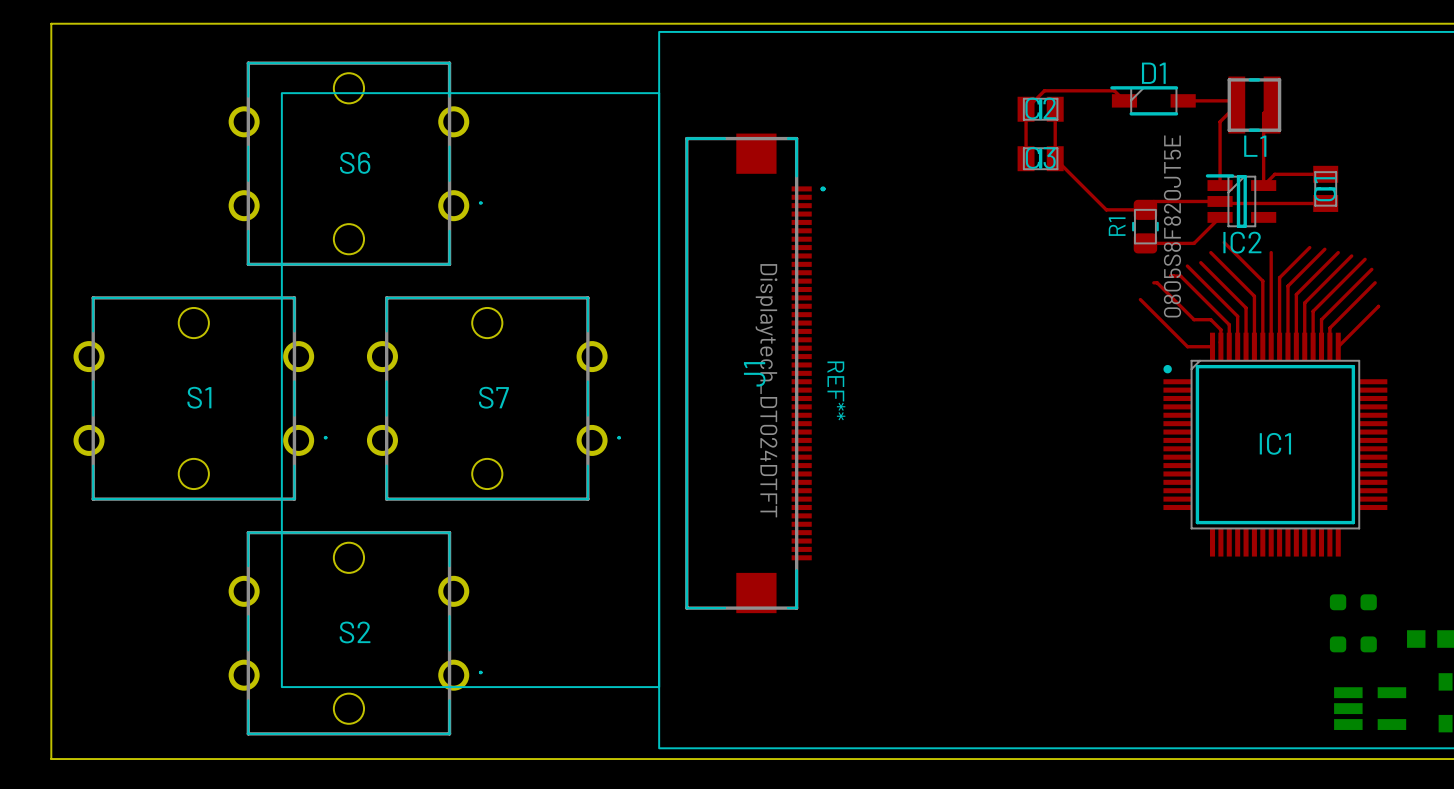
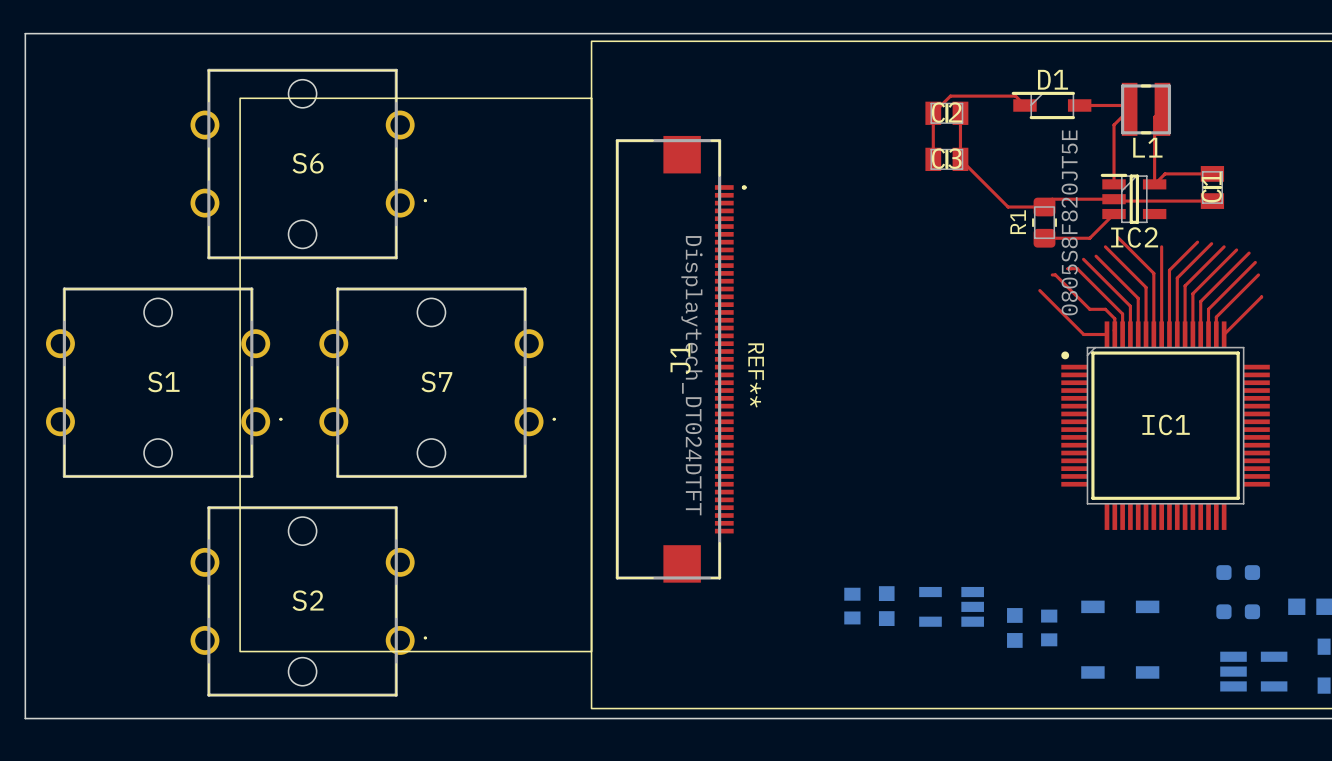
part: none -> (852, 606)
part: none -> (886, 606)
part: none -> (951, 606)
part: none -> (1120, 606)
part: none -> (1014, 627)
part: none -> (1049, 627)
part: none -> (1120, 672)

